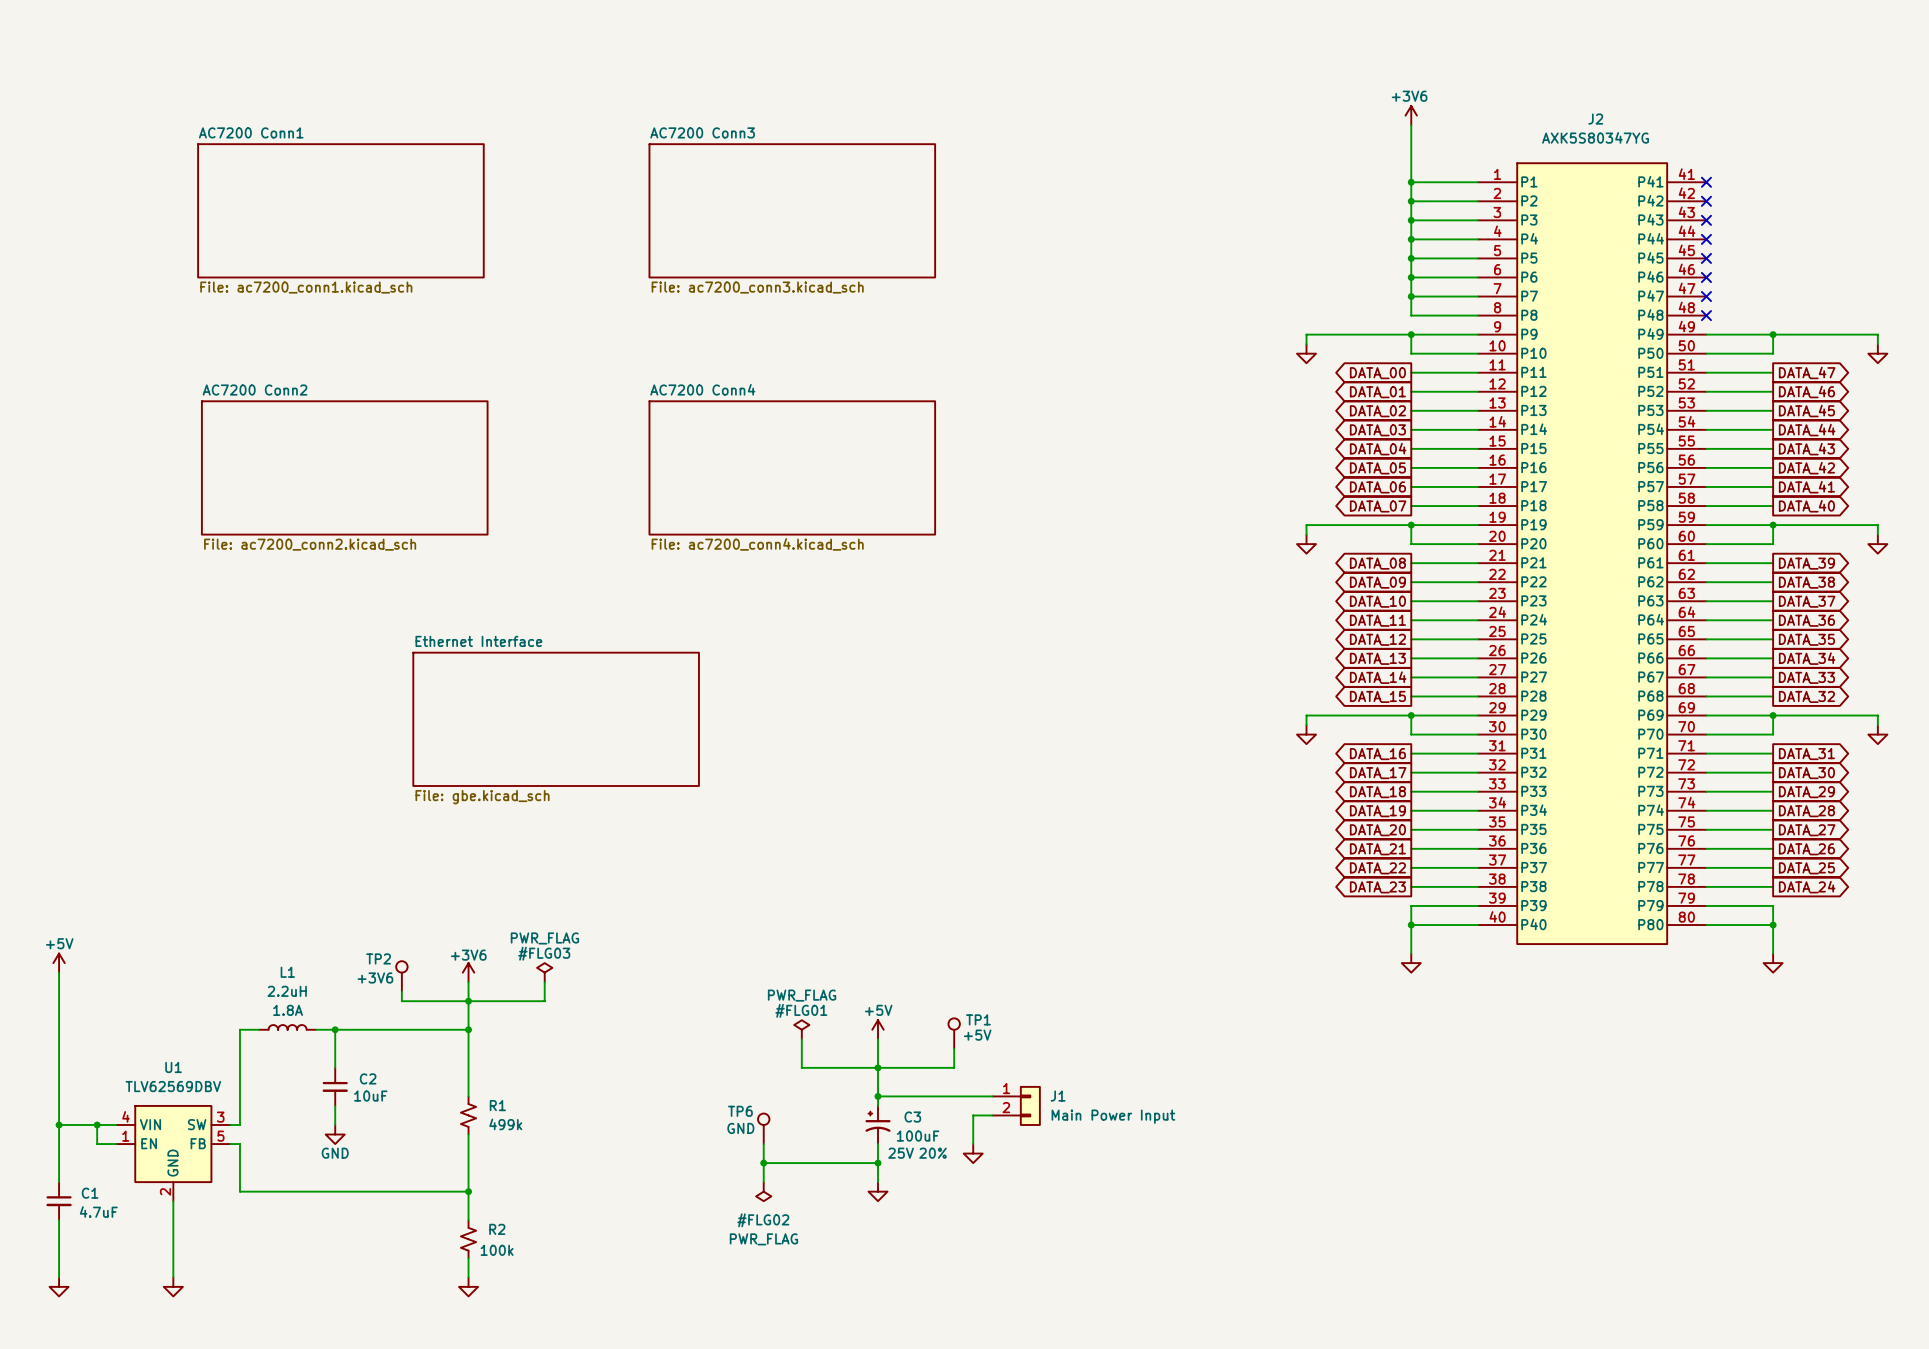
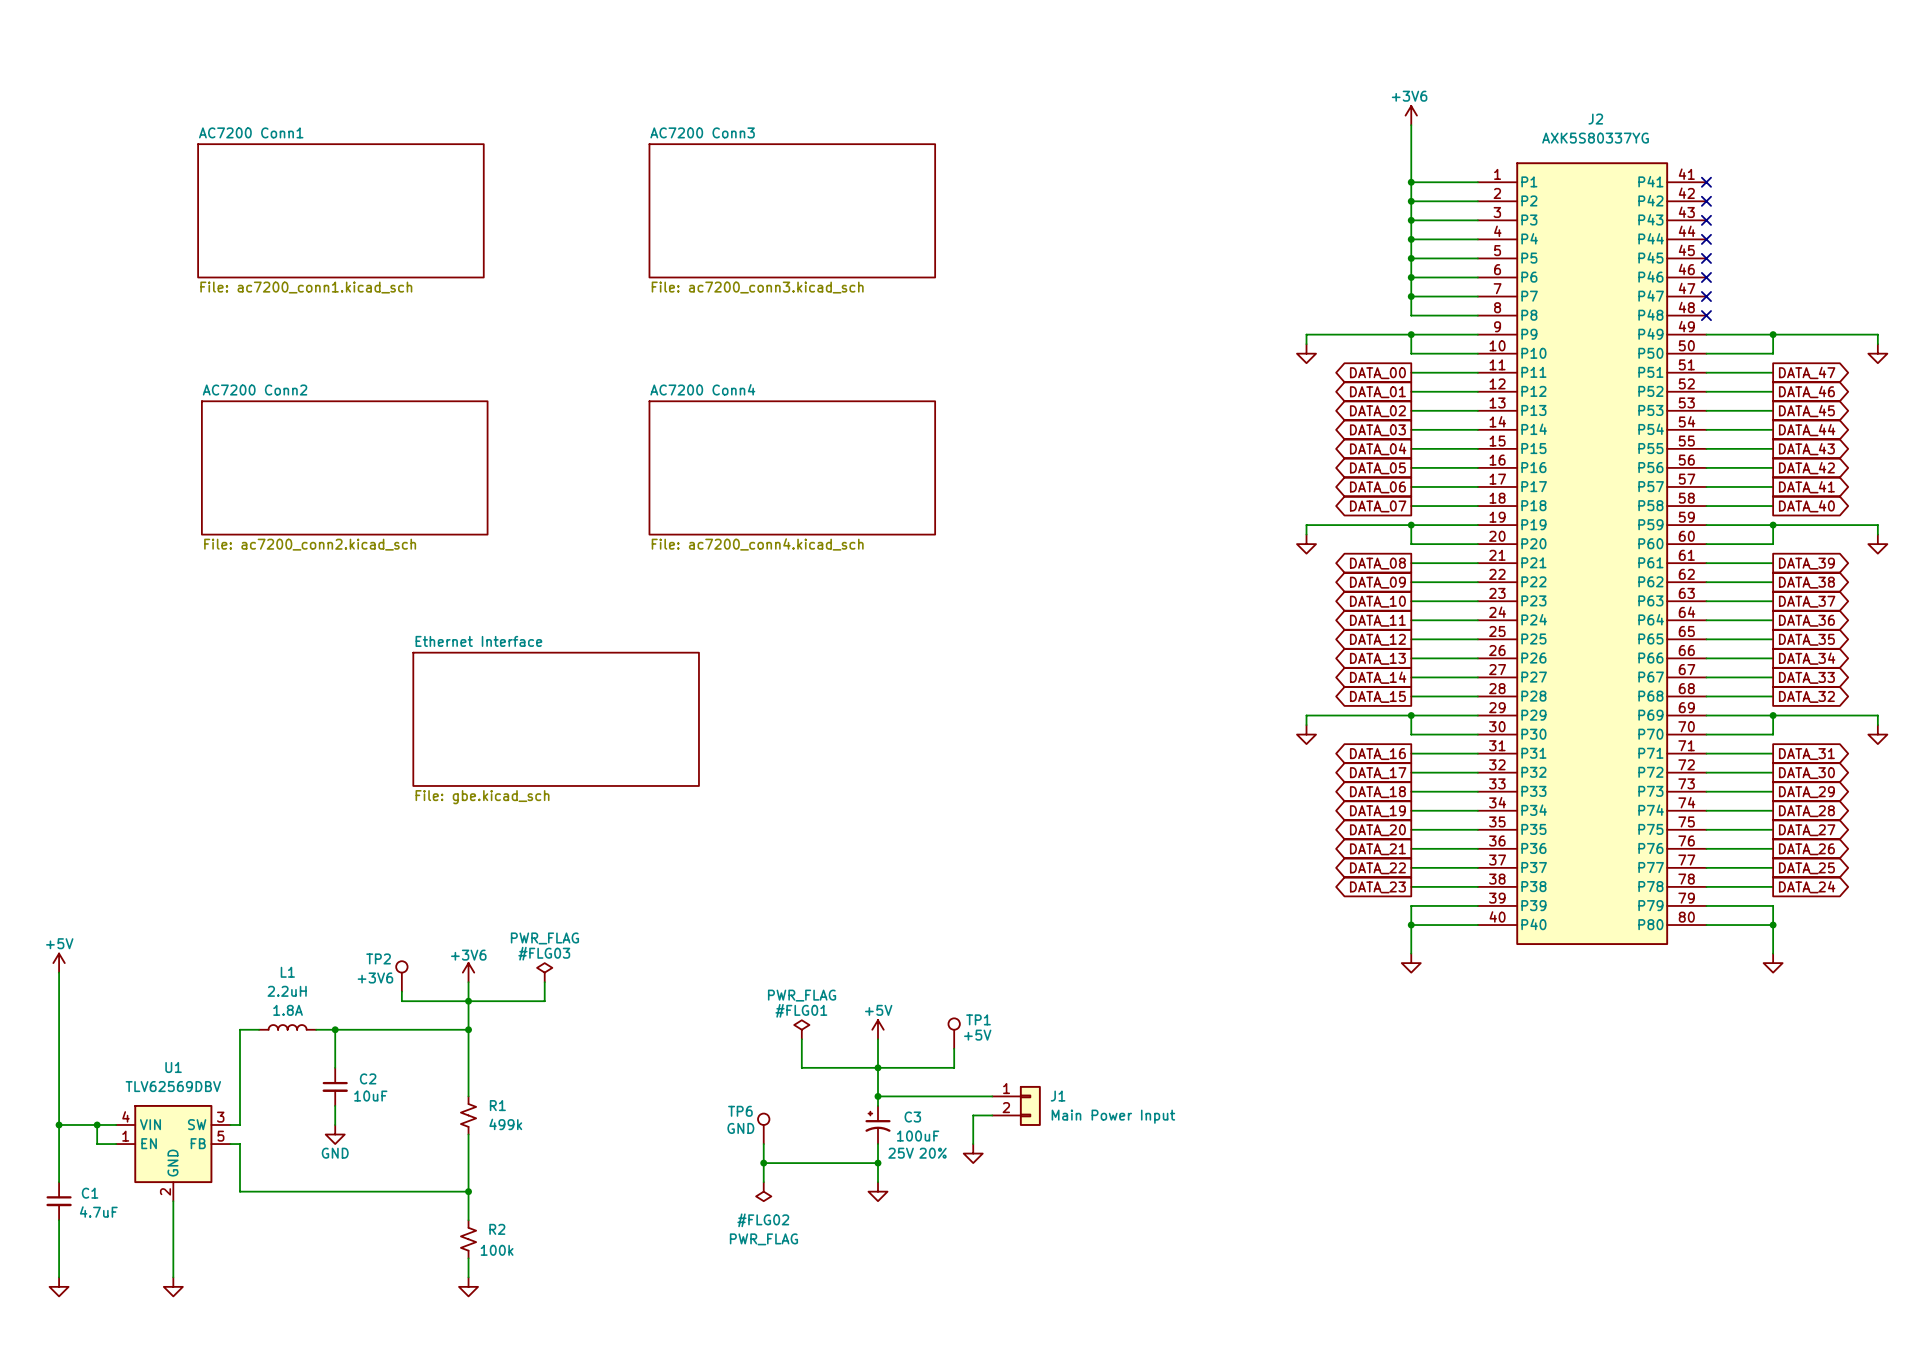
J2 value: AXK5S80347YG (1595, 137) -> AXK5S80337YG (1595, 138)

